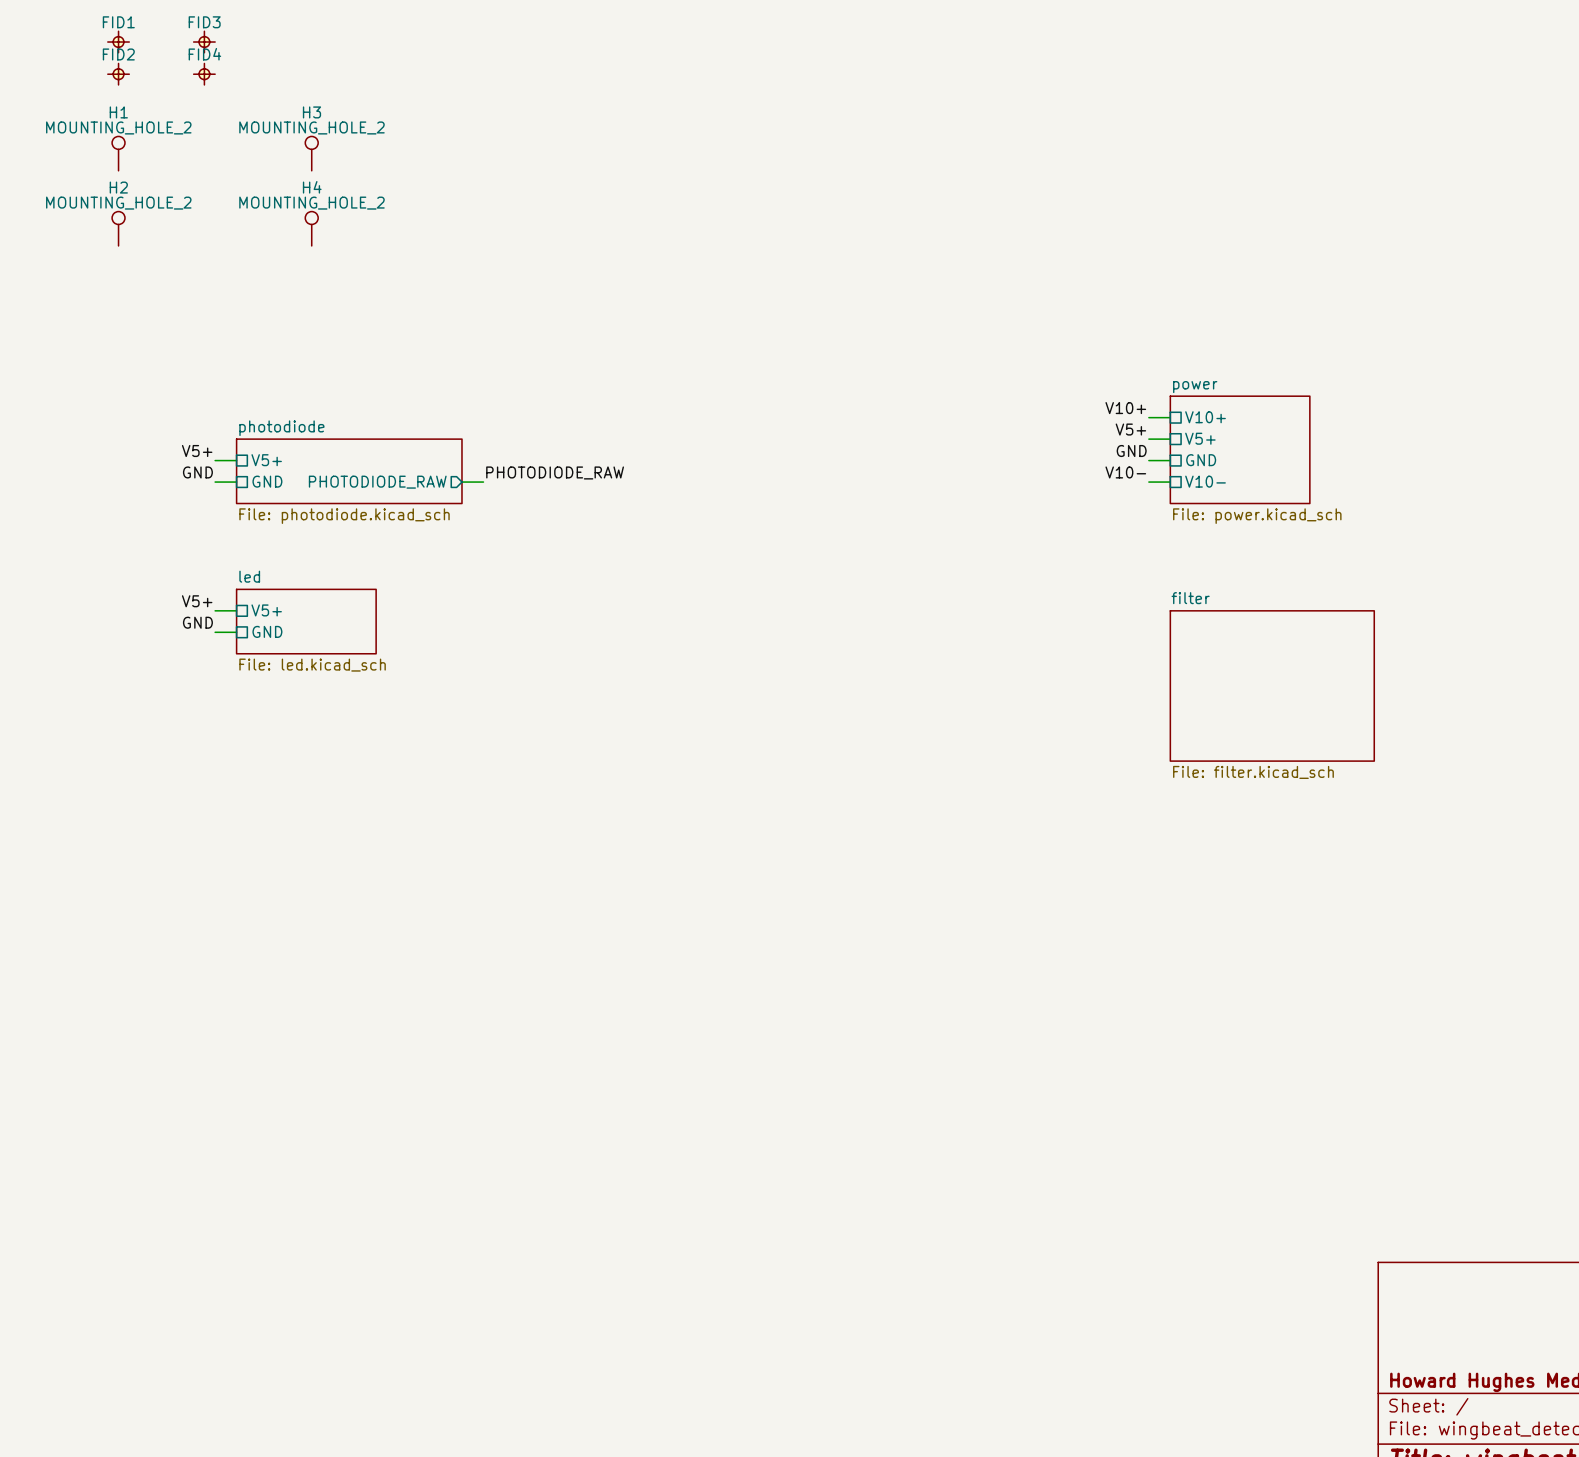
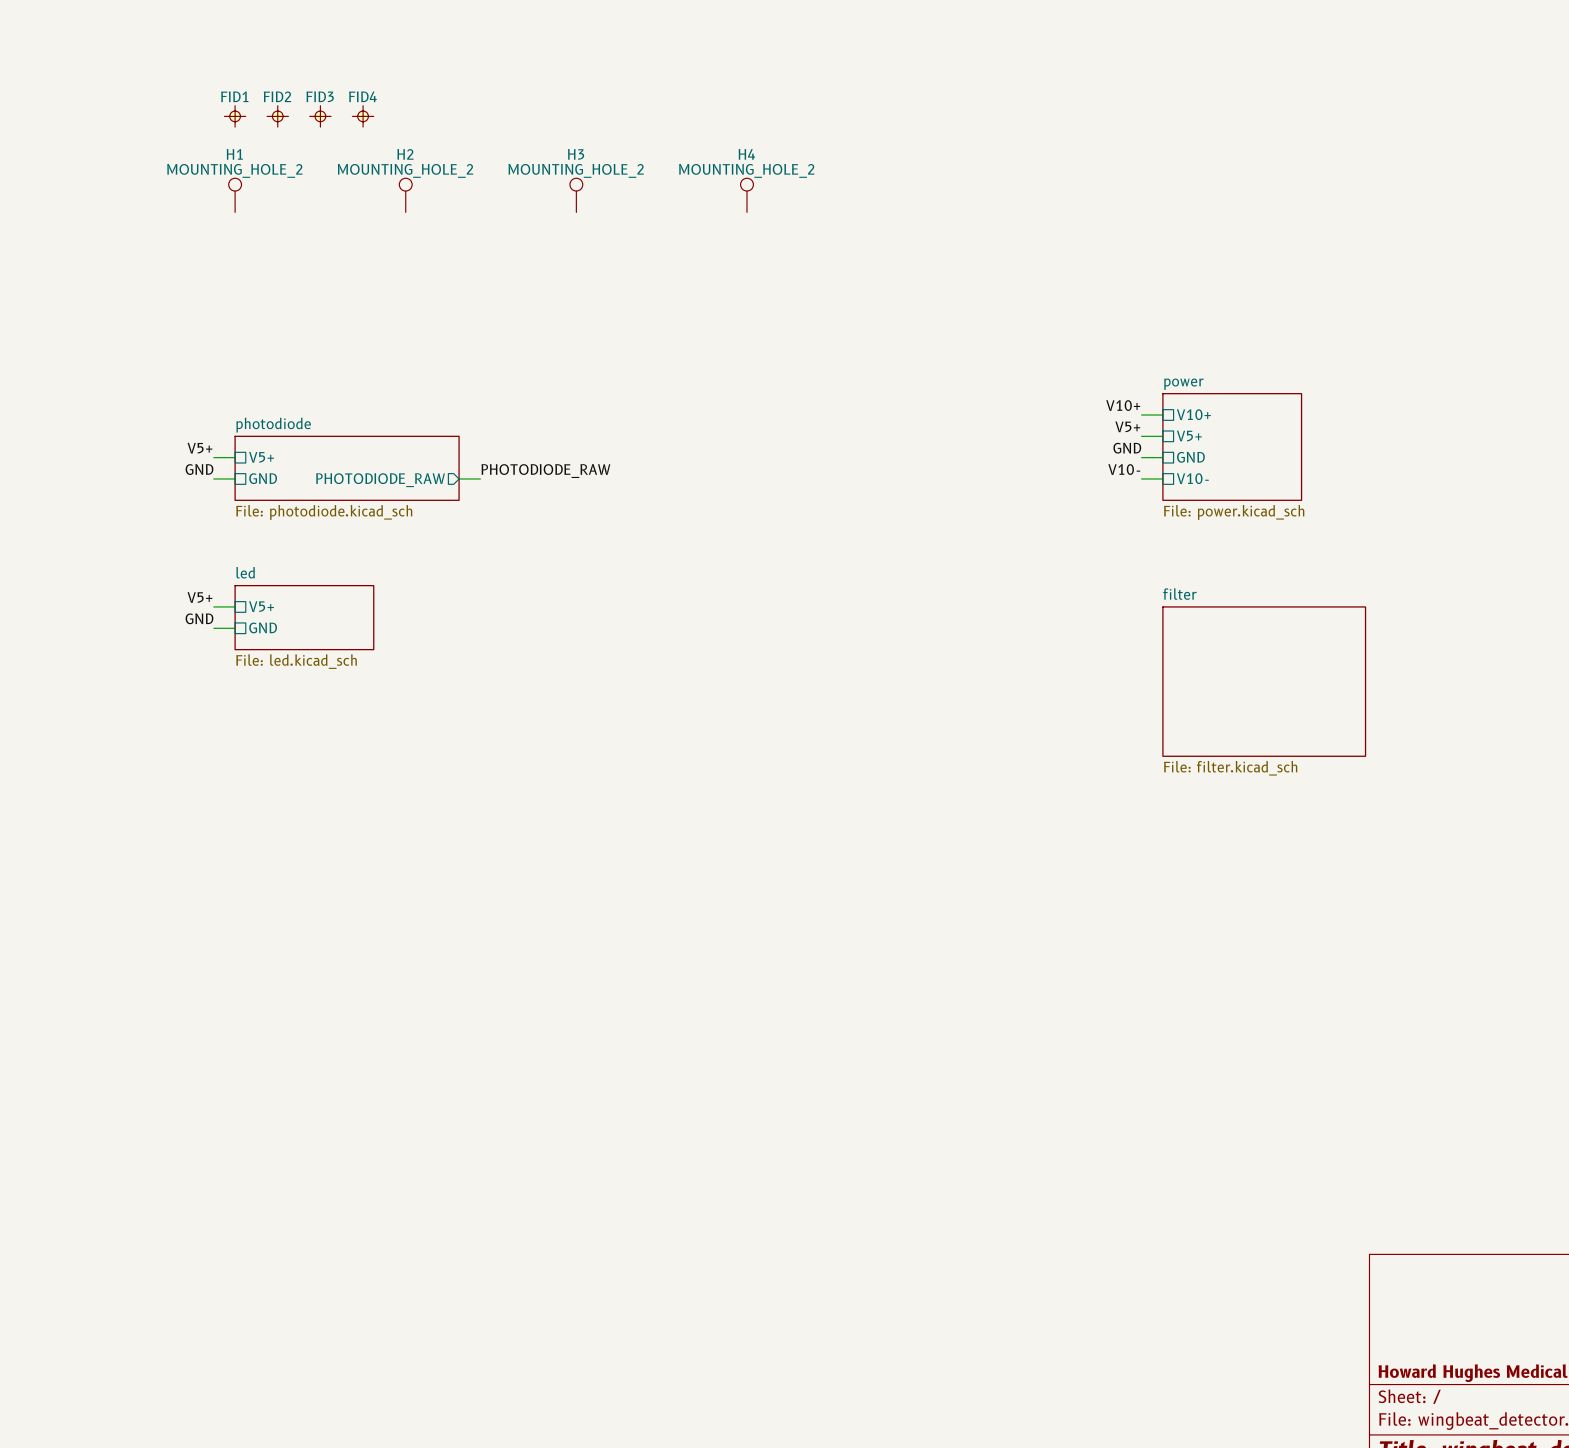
FID1 position: (118, 42) -> (235, 116)
FID3 position: (204, 42) -> (320, 116)
FID2 position: (118, 74) -> (277, 116)
FID4 position: (204, 74) -> (363, 116)
H1 position: (118, 153) -> (235, 195)
H3 position: (311, 153) -> (576, 195)
H2 position: (118, 228) -> (405, 195)
H4 position: (311, 228) -> (747, 195)

